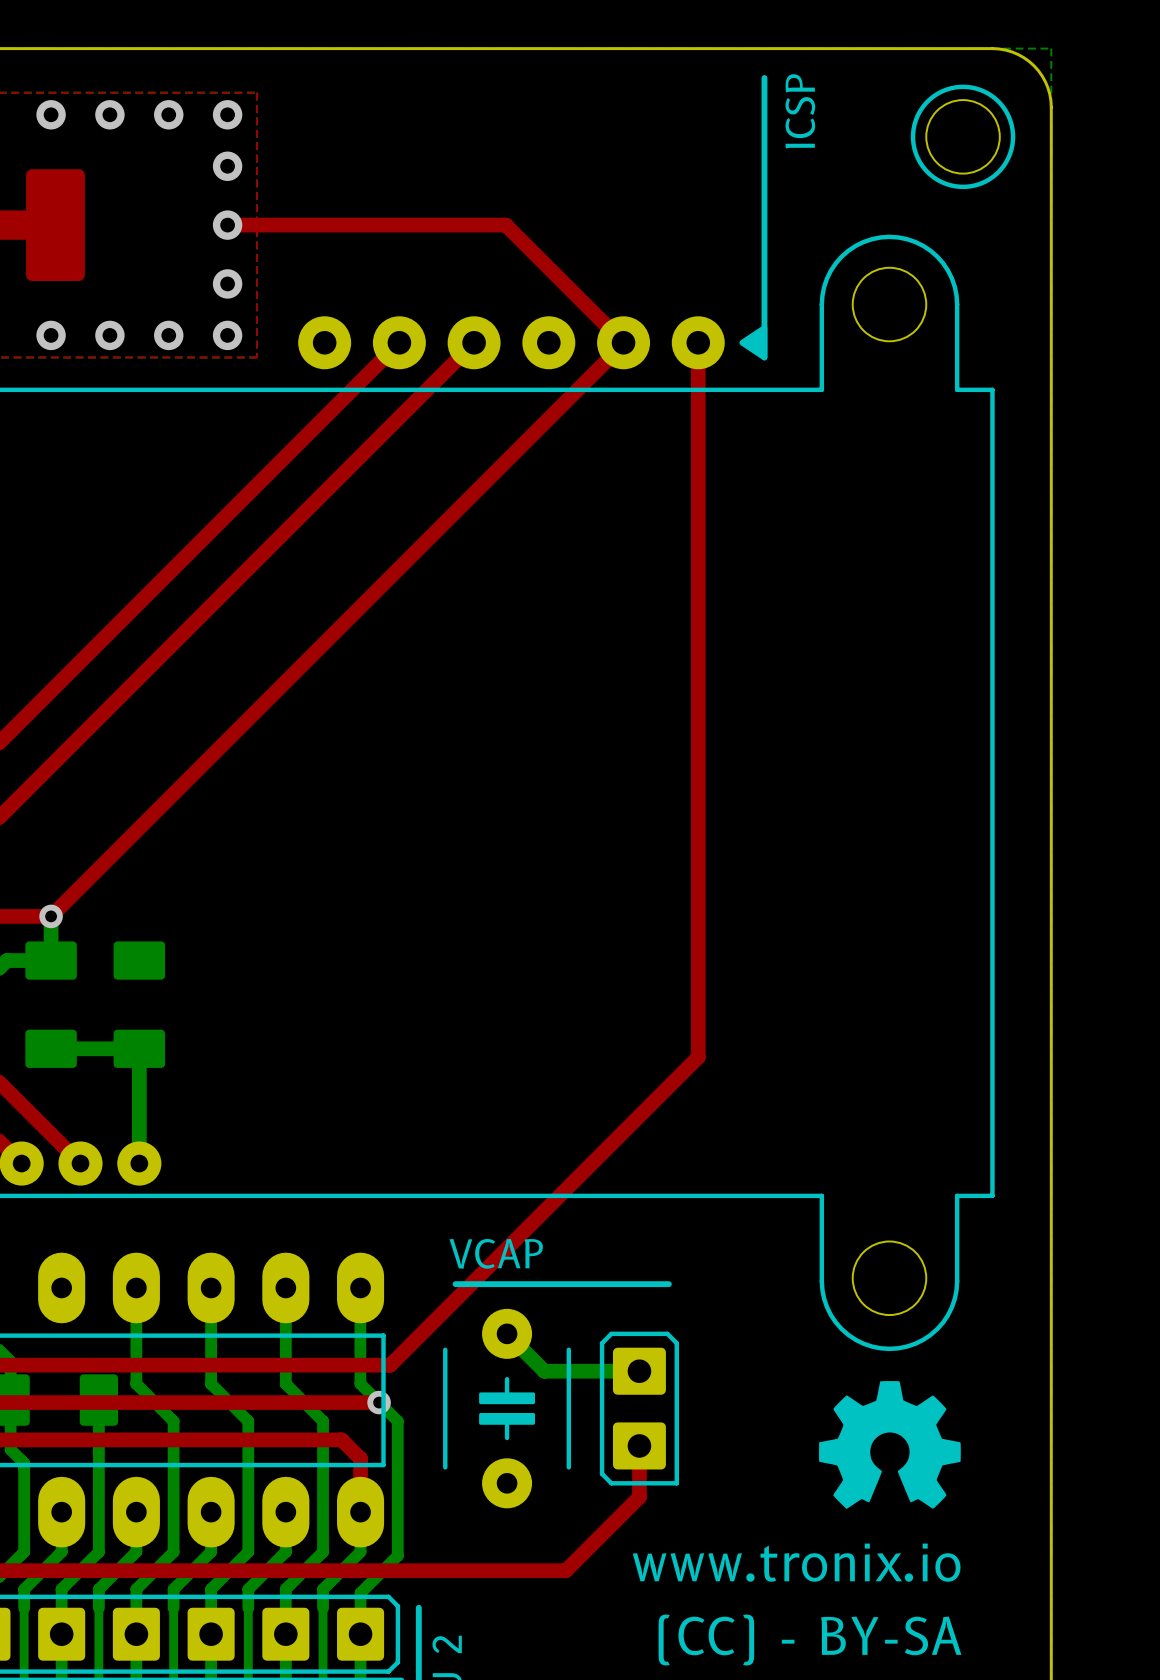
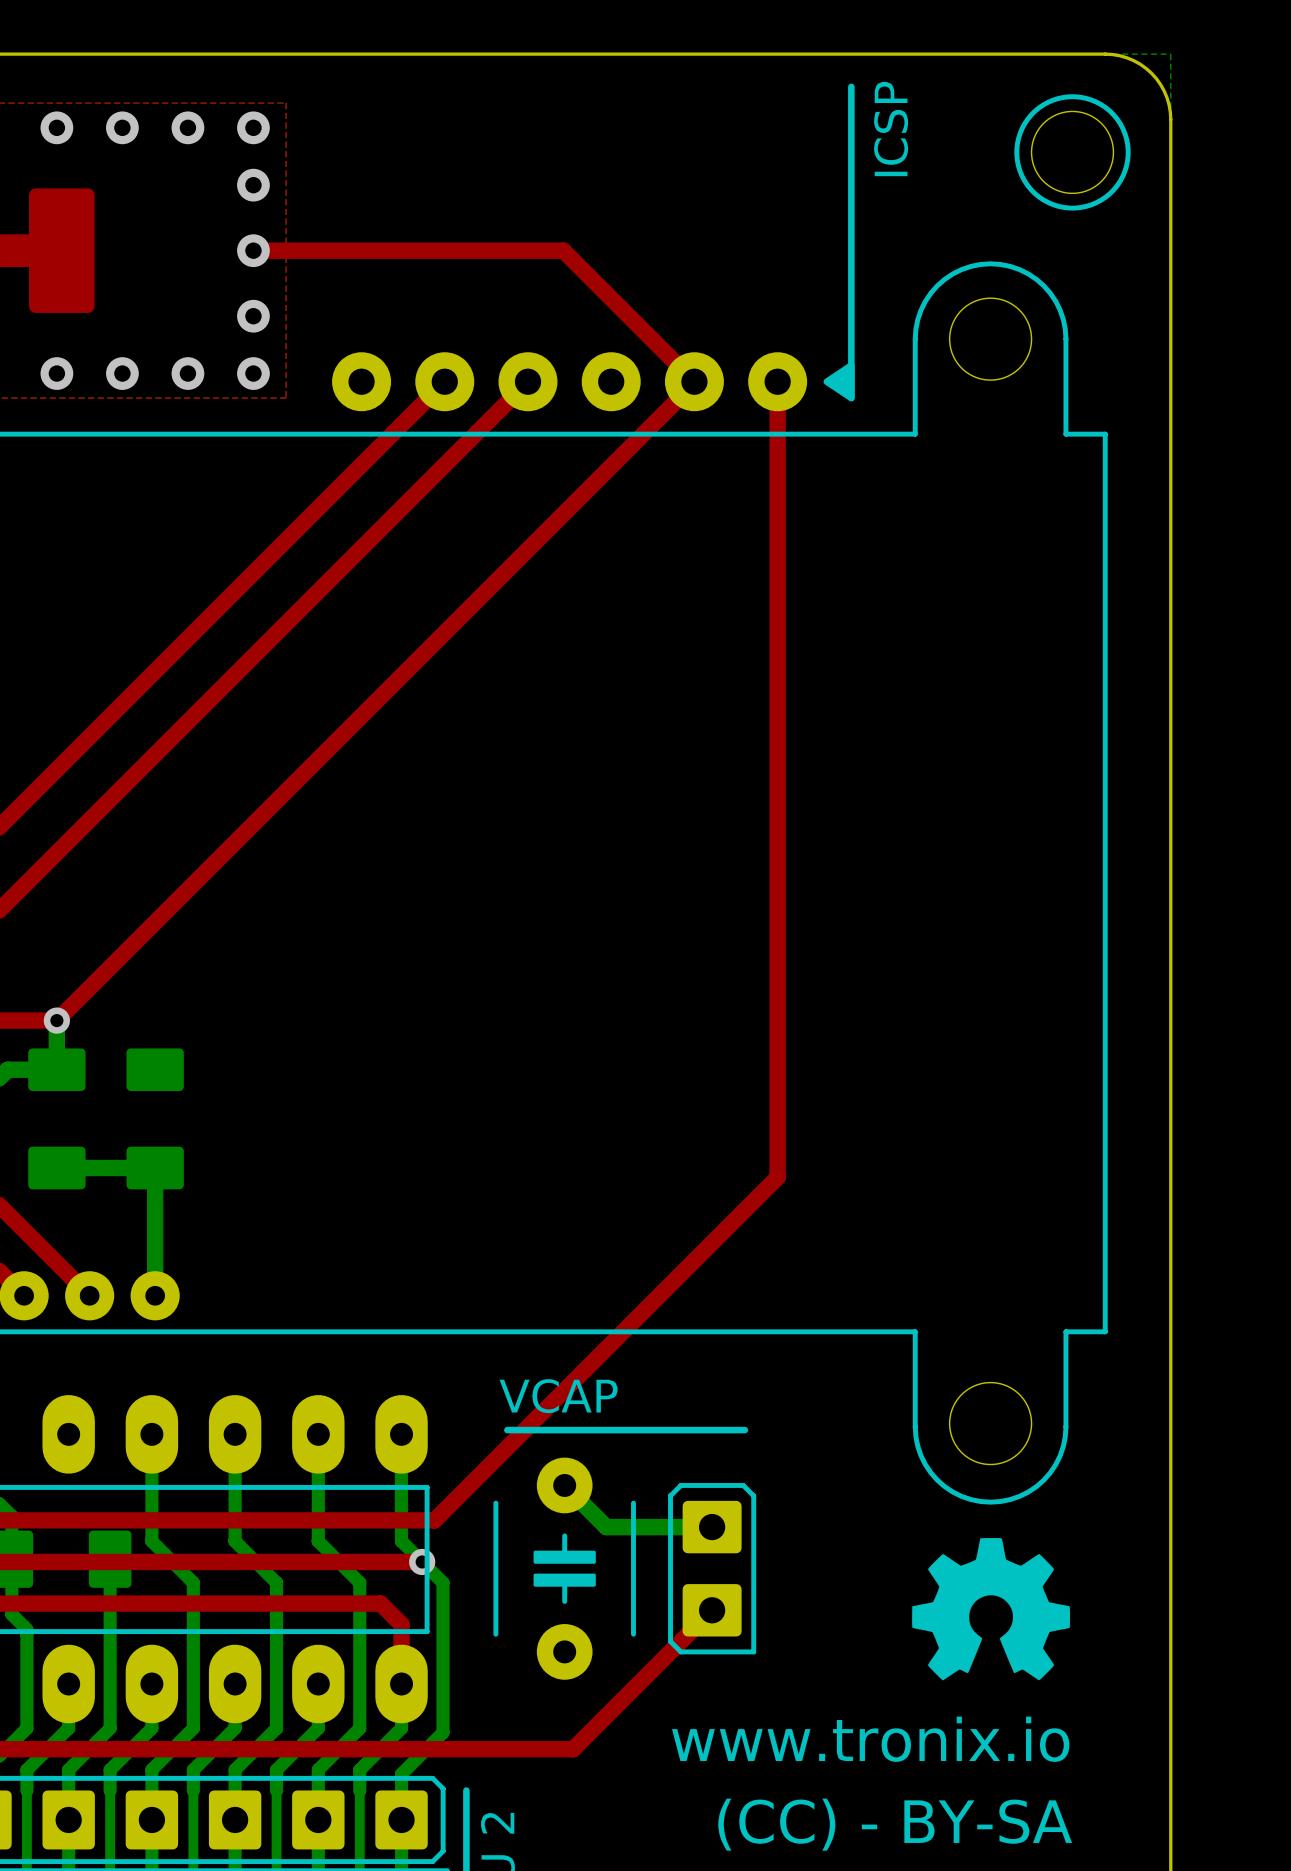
top track: (639, 1445) (639, 1497) (565, 1570) (514, 1570) -> (712, 1610) (573, 1749)

